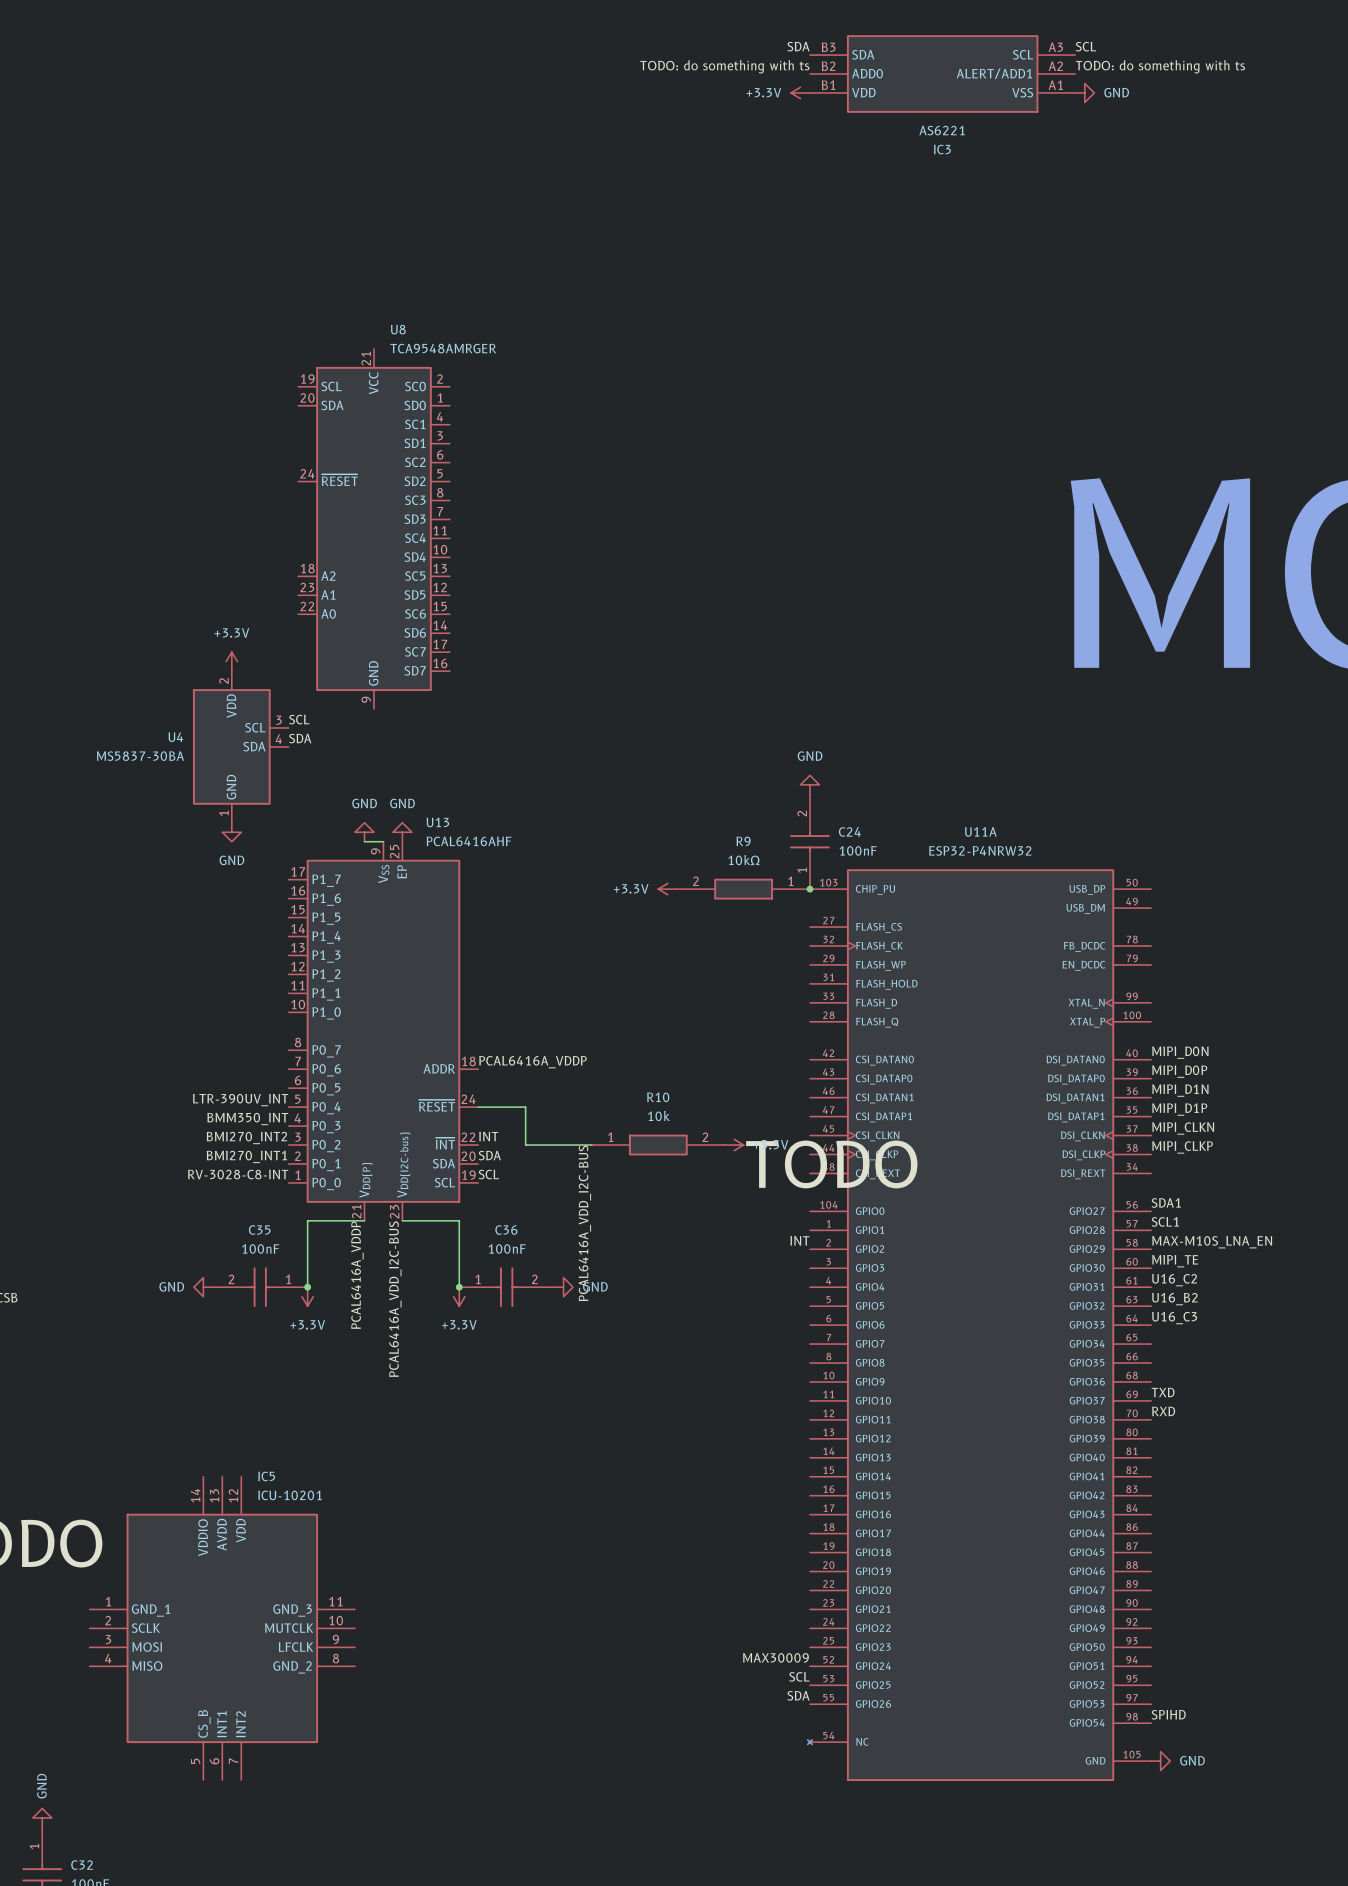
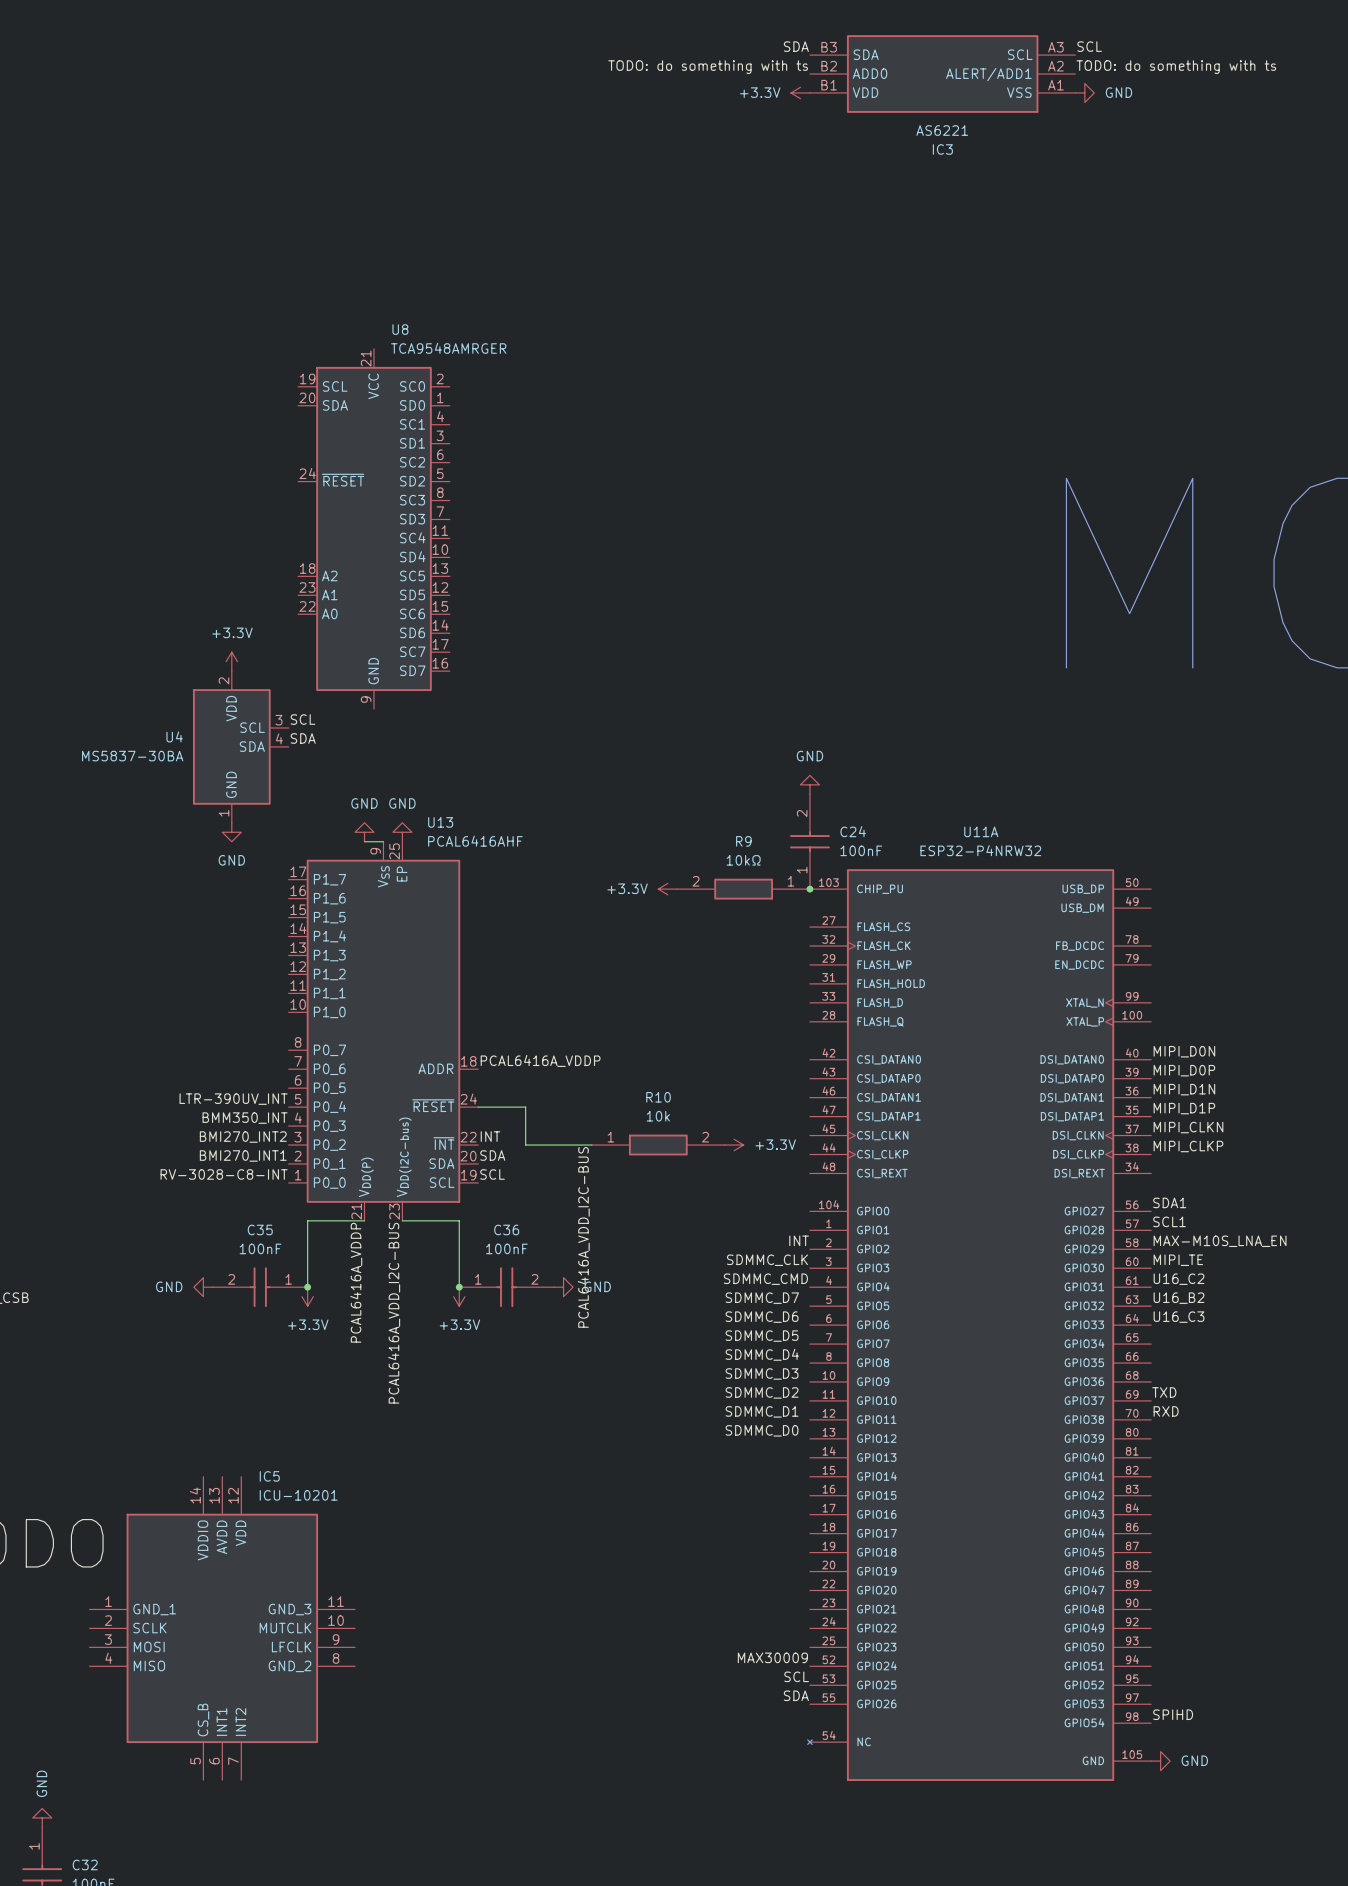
label: TODO (831, 1164) -> none
label: none -> SDMMC_CLK (767, 1260)
label: none -> SDMMC_CMD (765, 1279)
label: none -> SDMMC_D7 (762, 1298)
label: none -> SDMMC_D6 (762, 1317)
label: none -> SDMMC_D5 (762, 1336)
label: none -> SDMMC_D4 (762, 1354)
label: none -> SDMMC_D3 (762, 1373)
label: none -> SDMMC_D2 (762, 1392)
label: none -> SDMMC_D1 (762, 1411)
label: none -> SDMMC_D0 (762, 1430)

